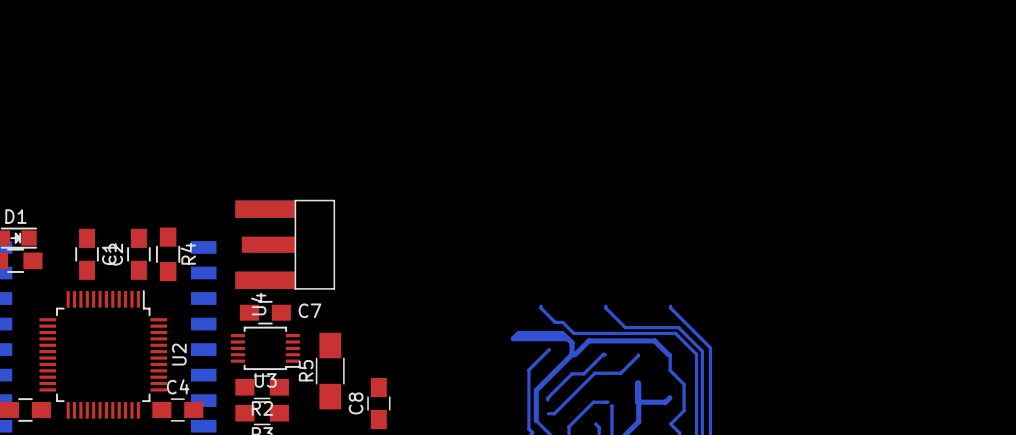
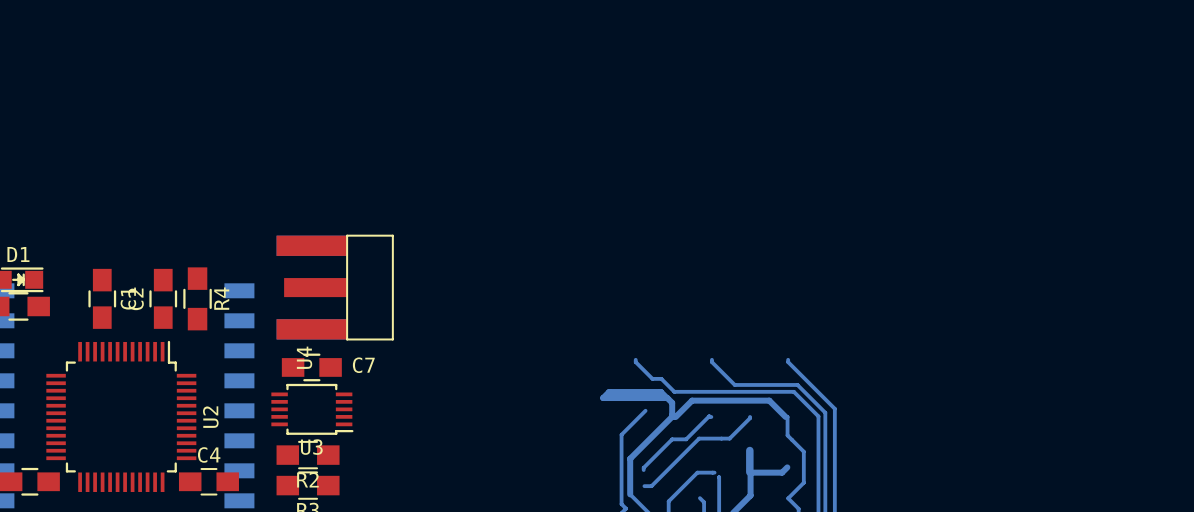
R5: (330, 371) -> none
C8: (378, 403) -> none

